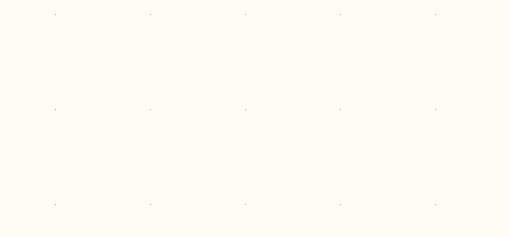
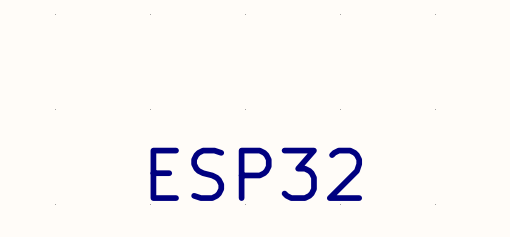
text: none -> ESP32 (256, 174)

